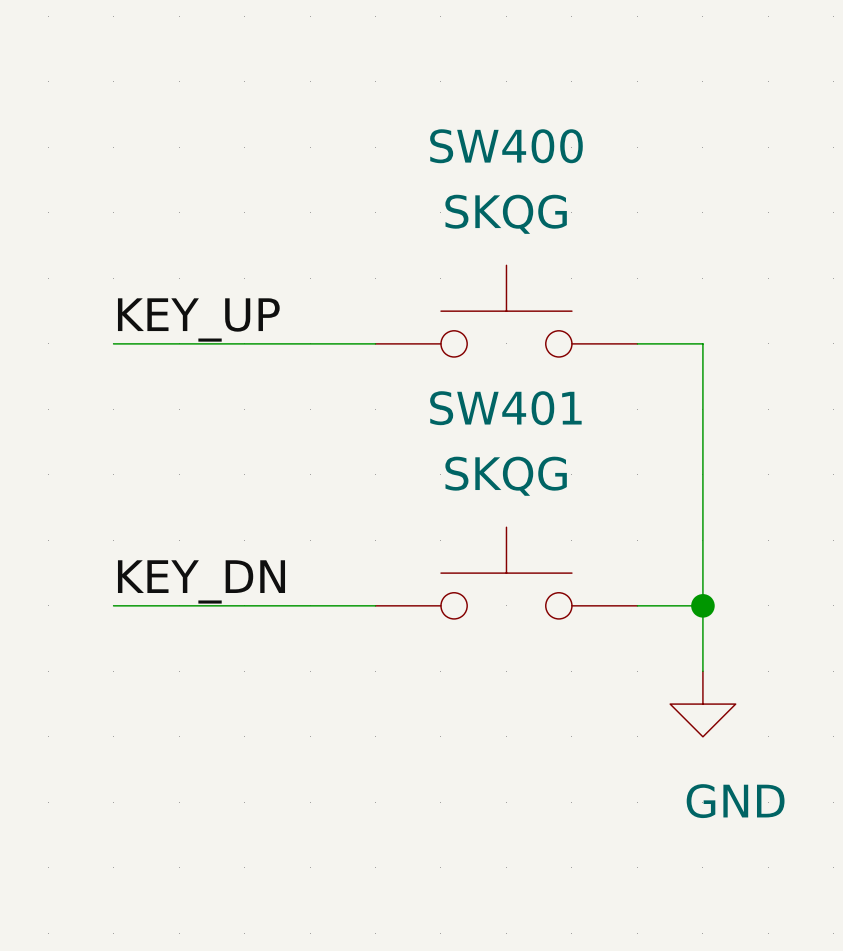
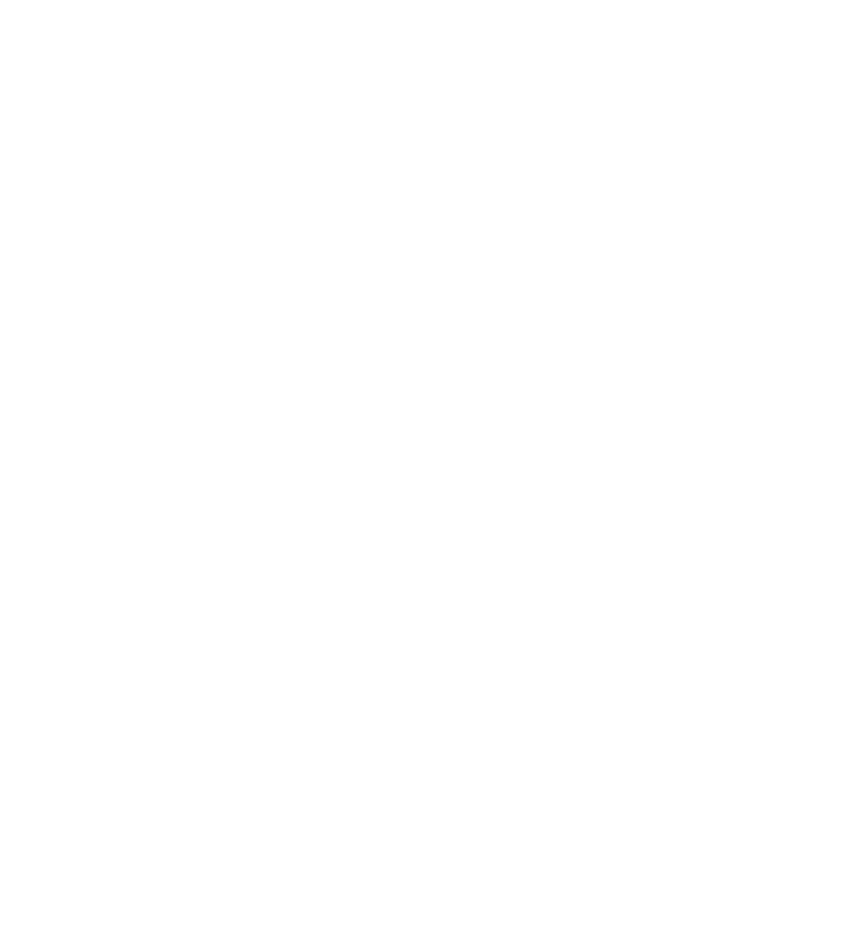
SW400: SKQG (506, 311) -> none
label: KEY_UP (198, 319) -> none
wire: (113, 343) (375, 343) -> none
wire: (637, 343) (702, 343) (702, 671) -> none
SW401: SKQG (506, 573) -> none
label: KEY_DN (201, 581) -> none
wire: (113, 605) (375, 605) -> none
wire: (637, 605) (702, 605) -> none
junction: (702, 605) -> none
power symbol: GND (702, 704) -> none

